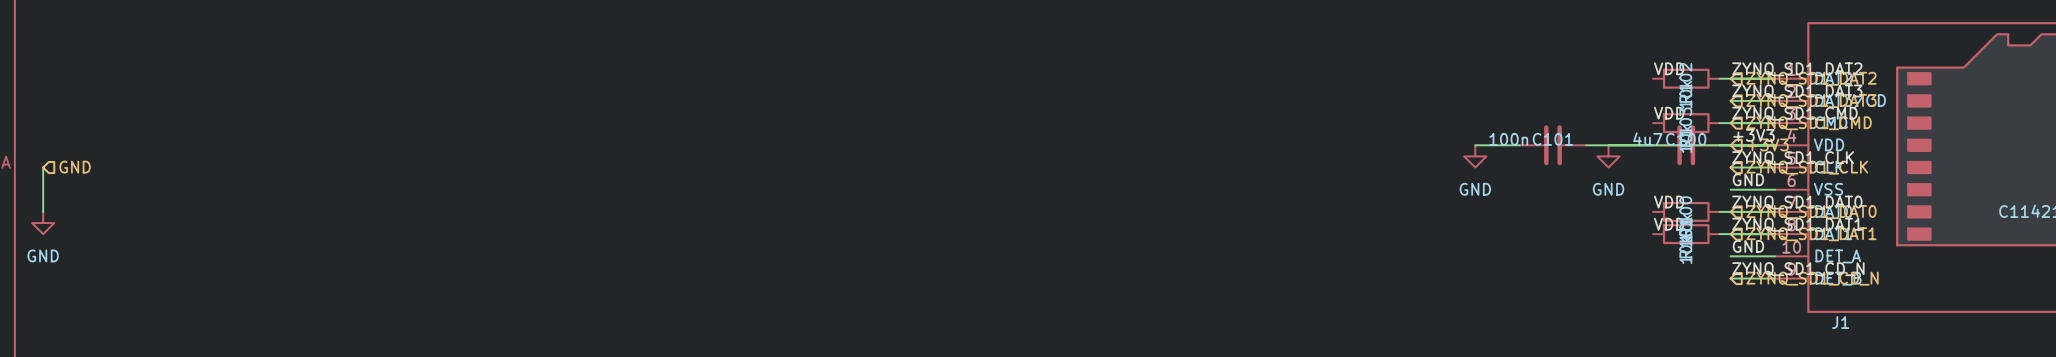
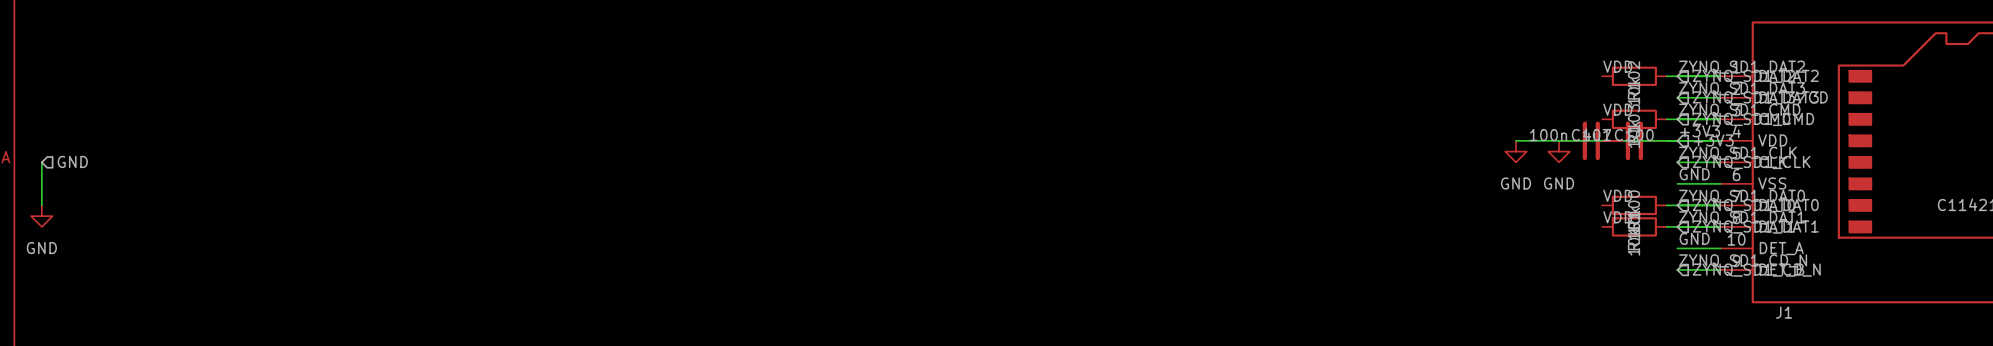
wire: (1475, 145) (1519, 145) -> none
C101 position: (1553, 145) -> (1591, 140)
power symbol position: GND (1475, 156) -> GND (1516, 151)

